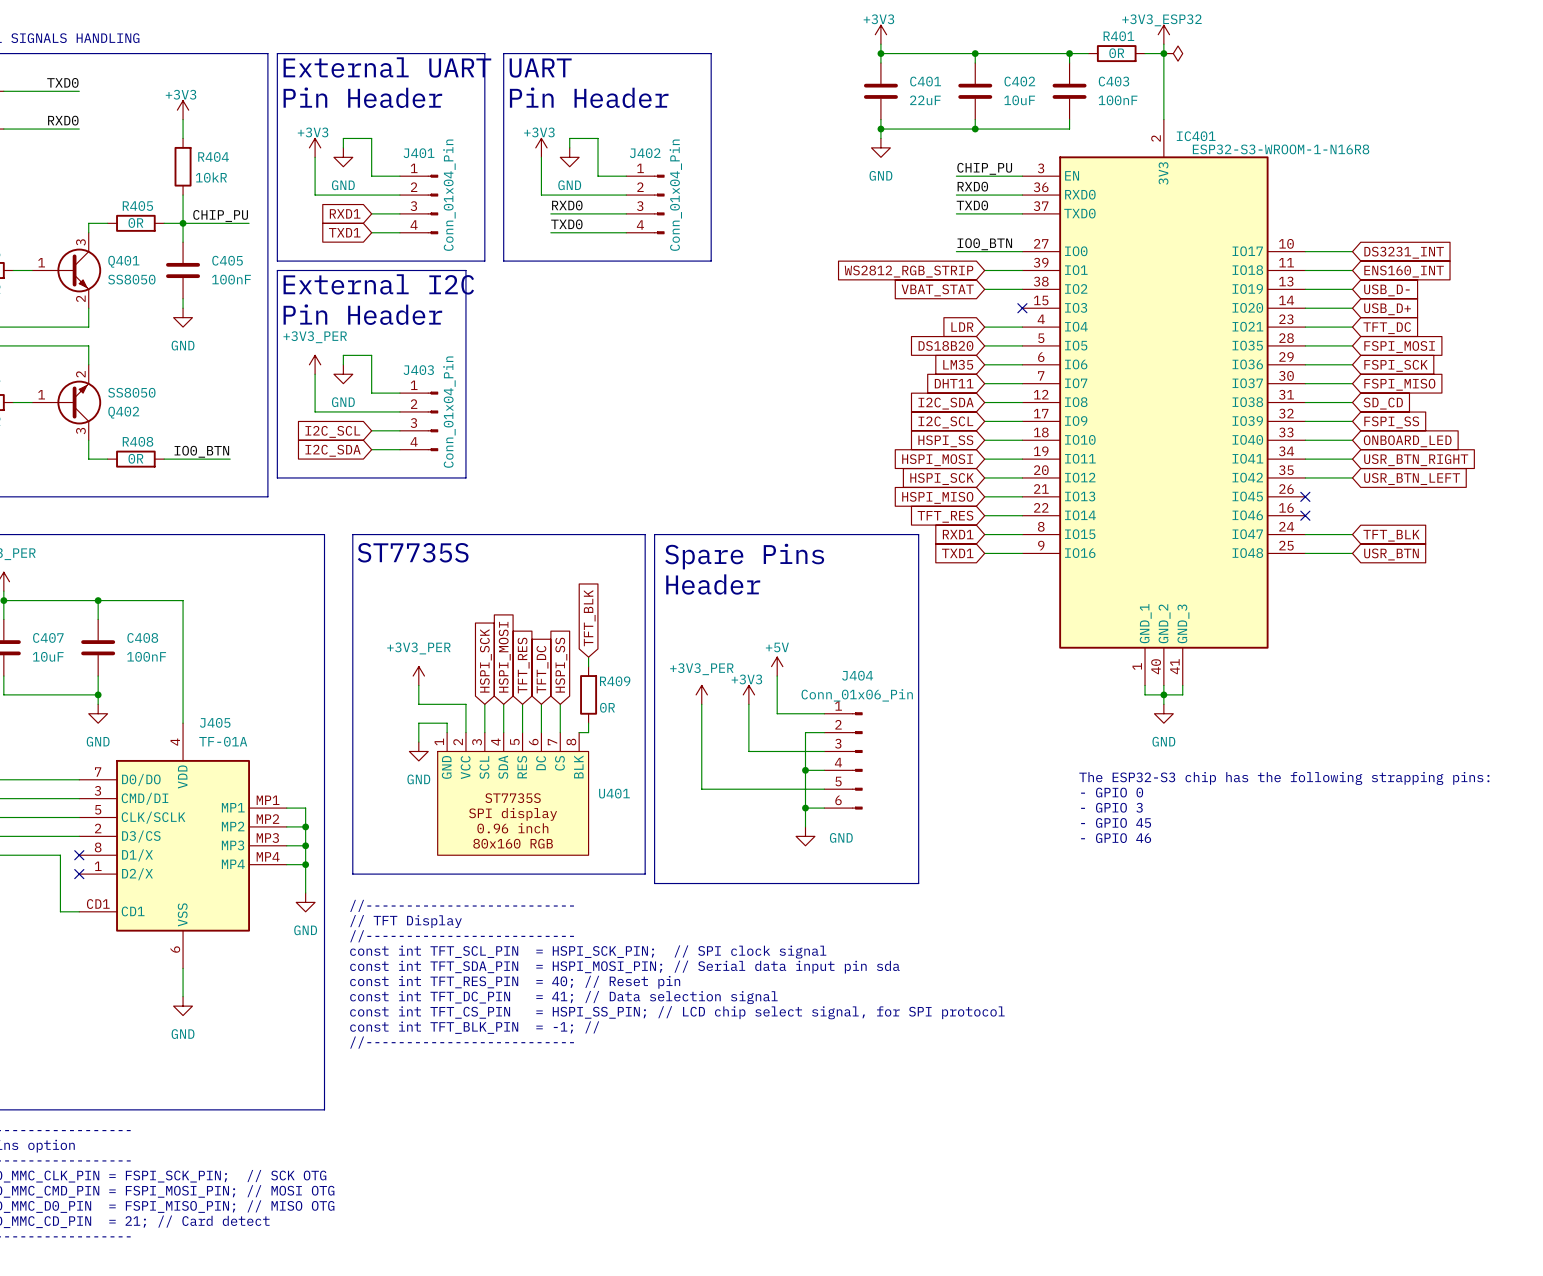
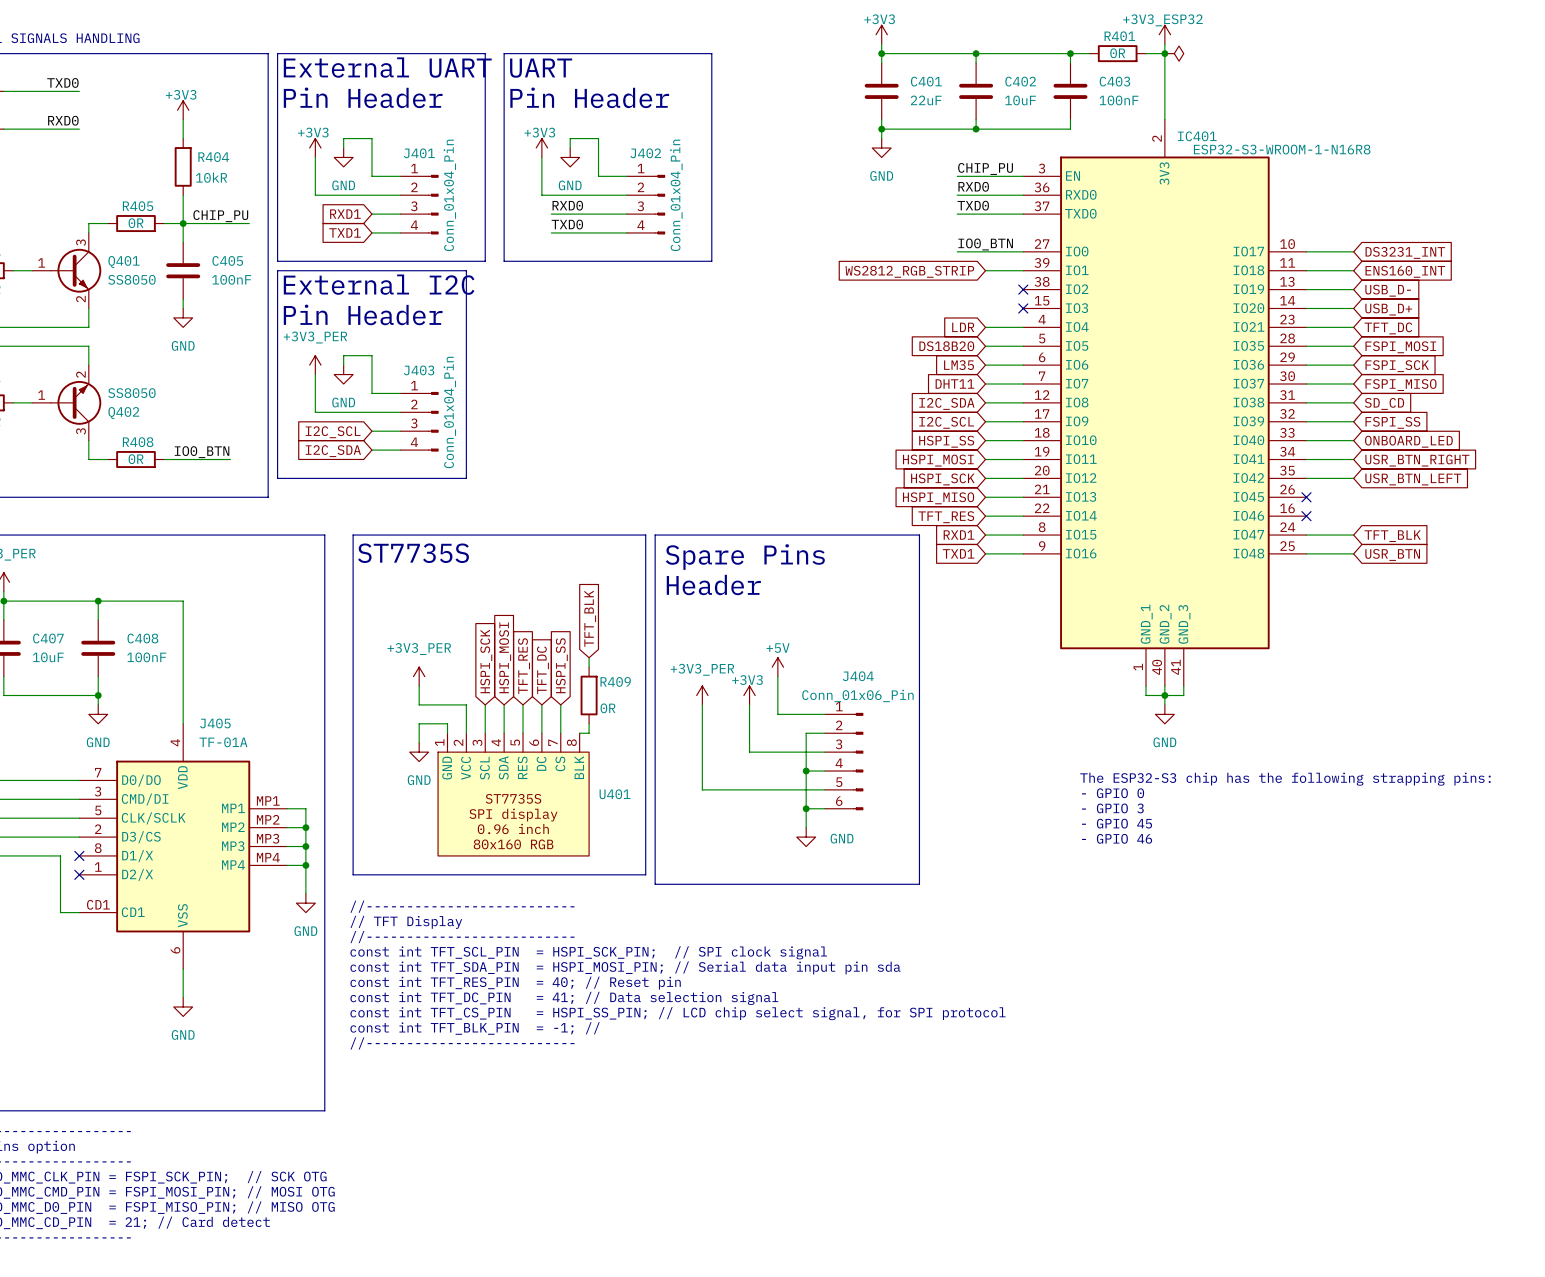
wire: (984, 289) (1022, 289) -> none
no-connect mark: none -> (1023, 289)
global label: VBAT_STAT (937, 290) -> none

